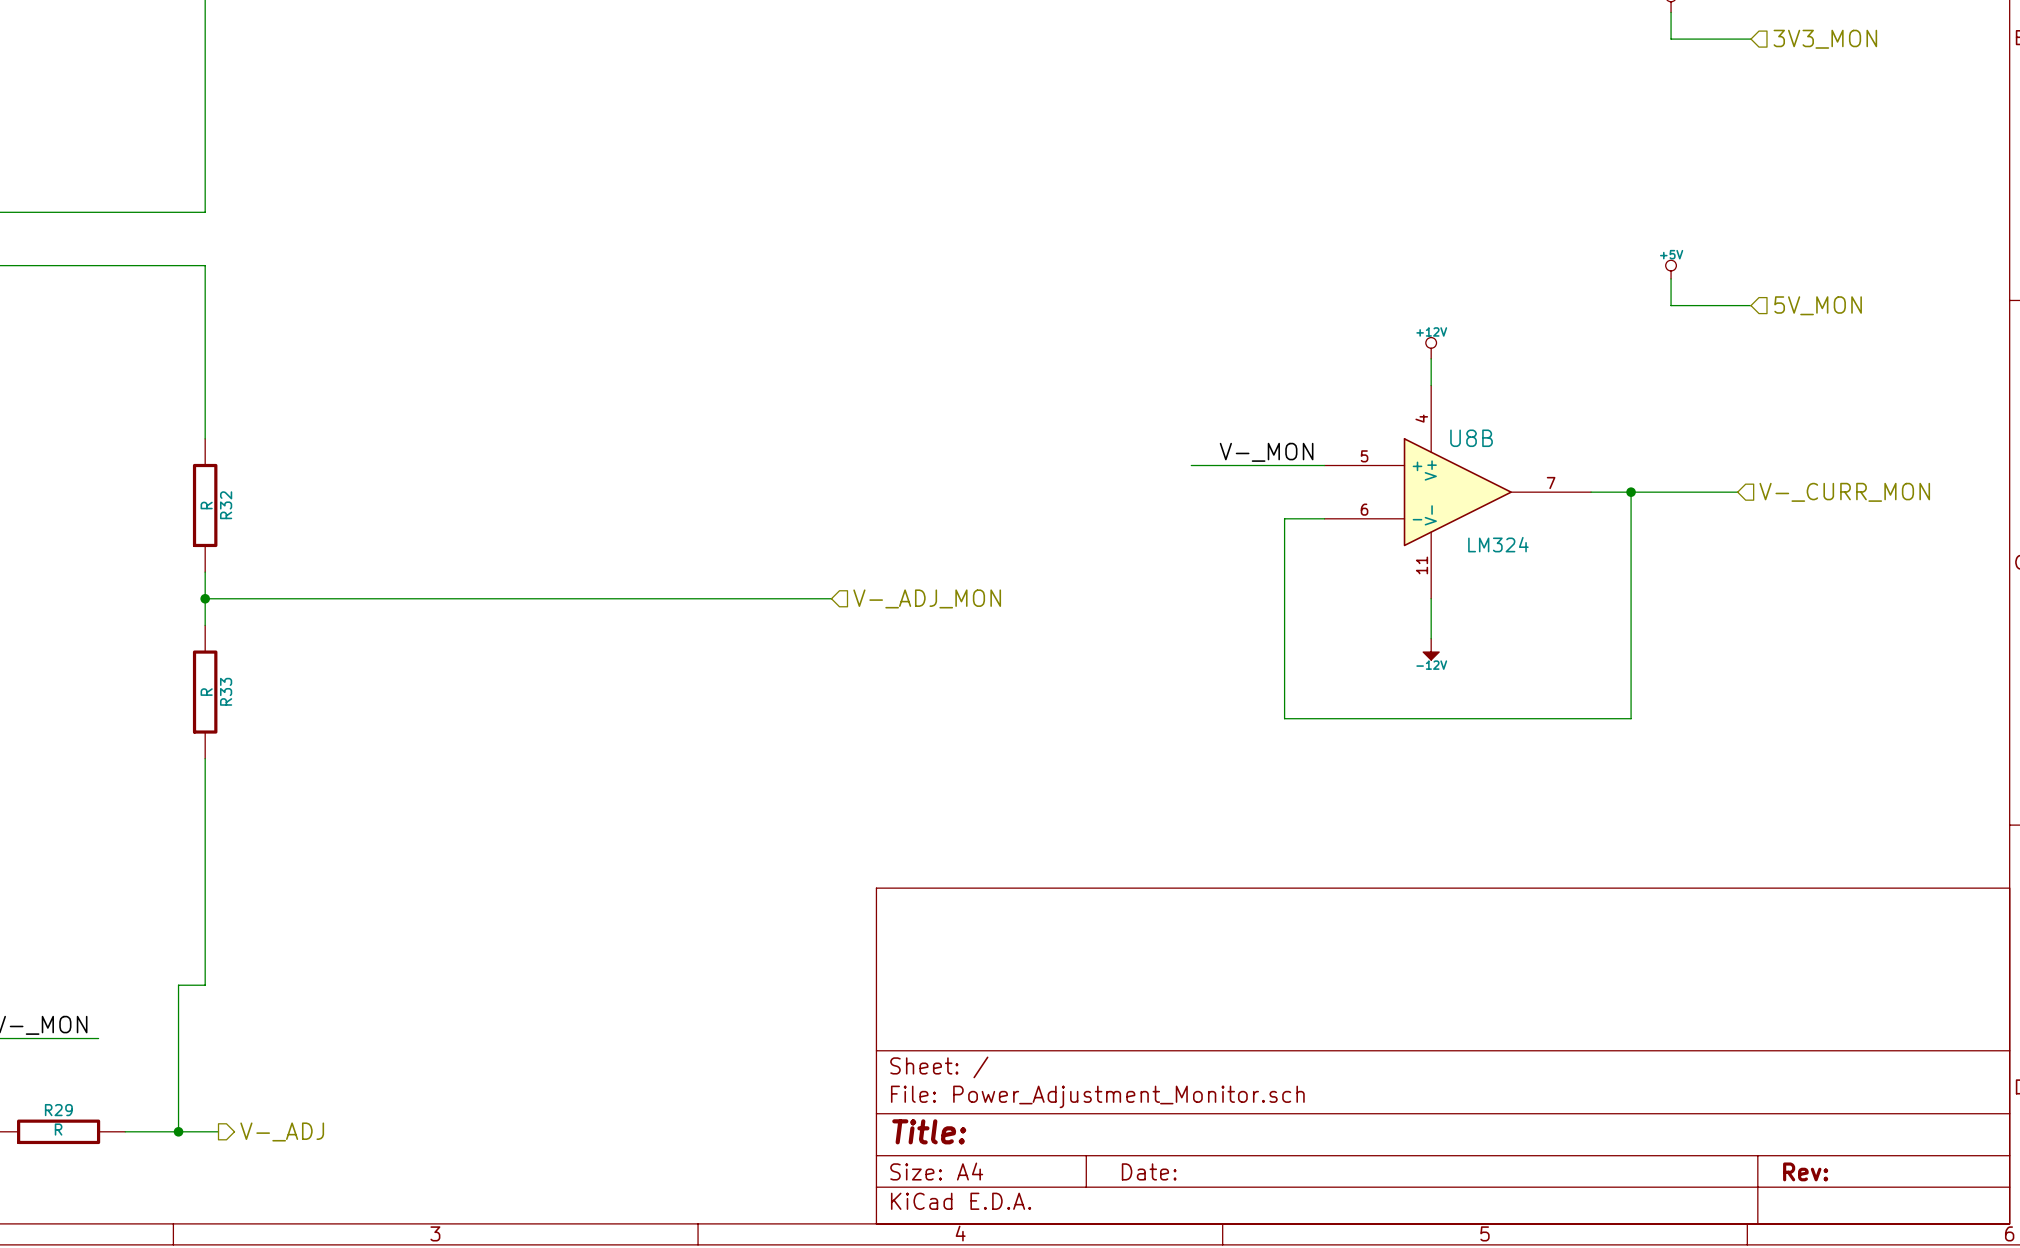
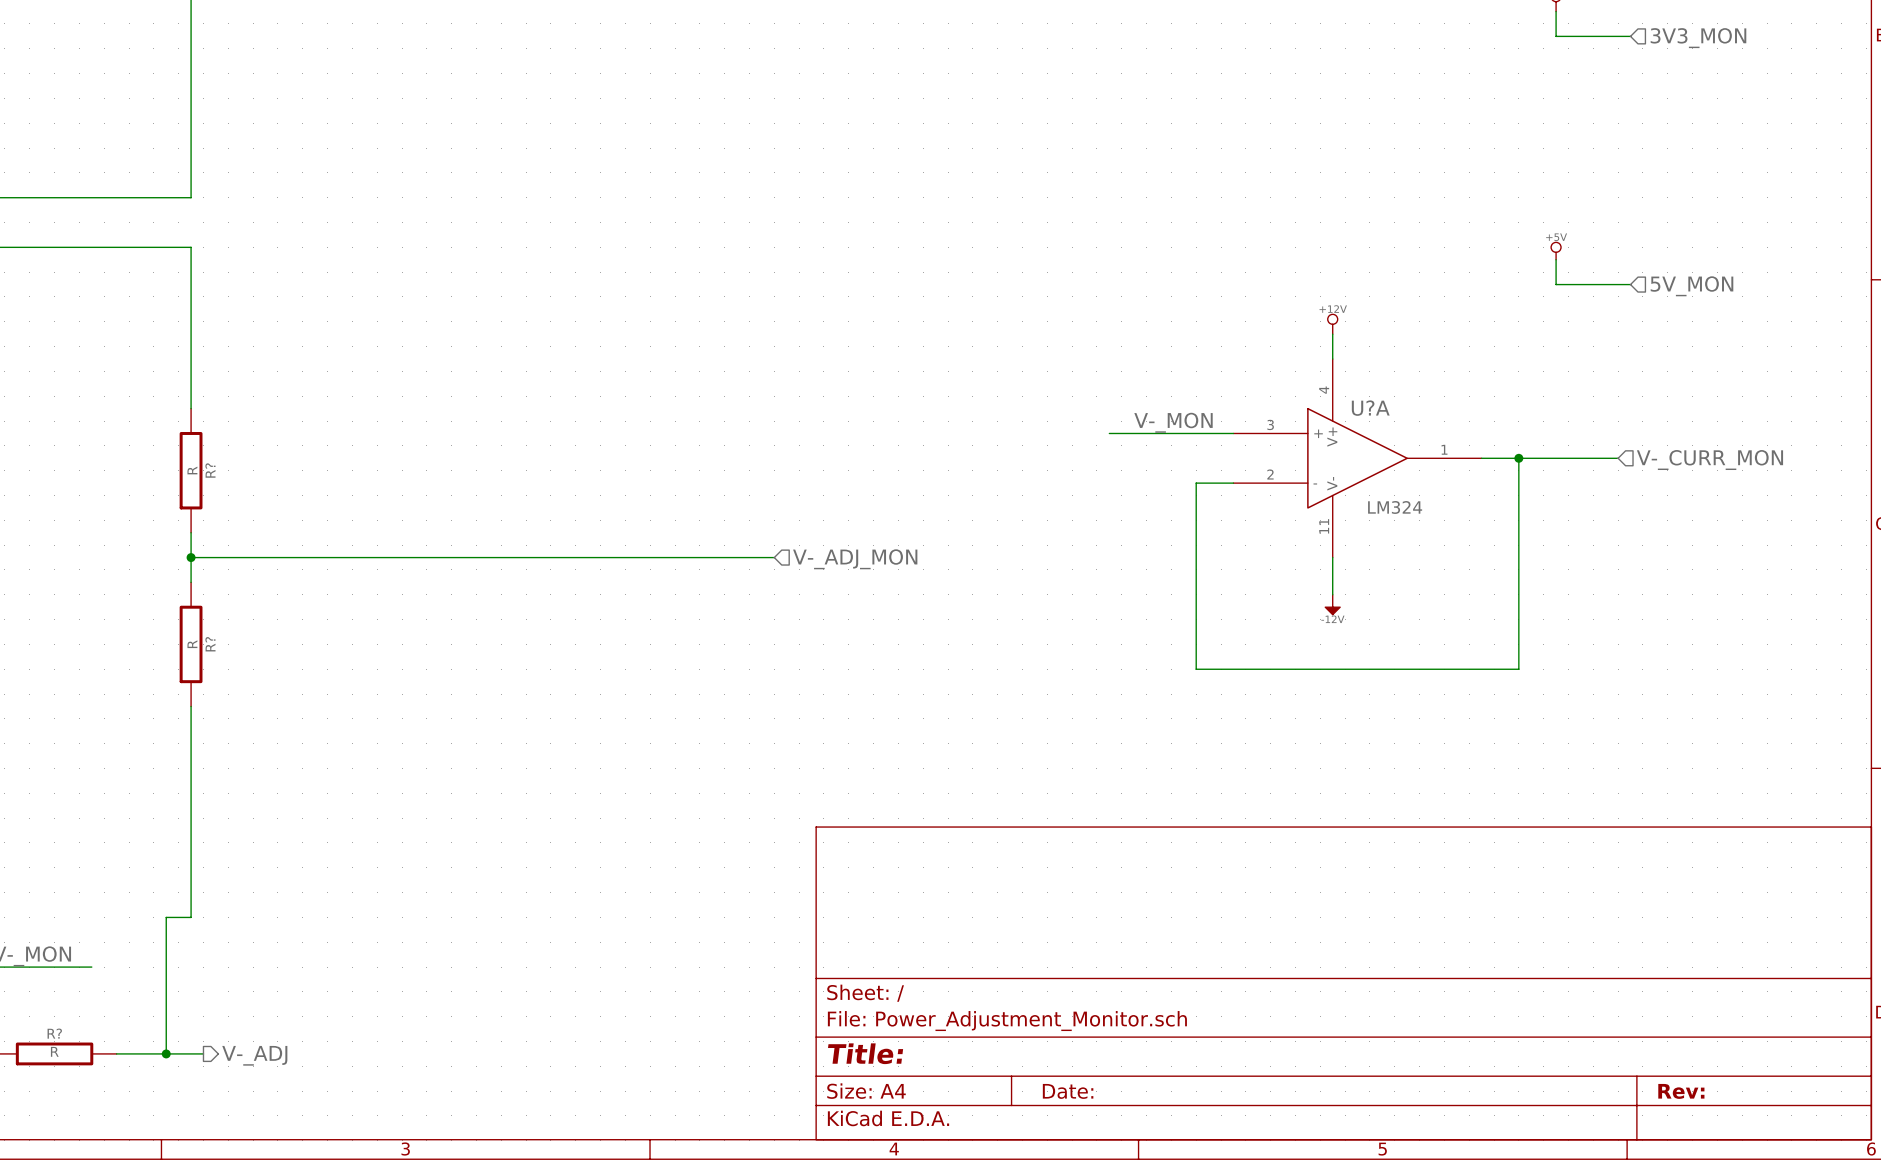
U8B name: U8B (1471, 438) -> U?A (1370, 408)
U8B pin number: 5 (1364, 456) -> 3 (1270, 424)
U8B pin number: 7 (1551, 482) -> 1 (1444, 449)
R32 name: R32 (226, 505) -> R? (210, 470)
U8B pin number: 6 (1364, 509) -> 2 (1270, 474)
R33 name: R33 (226, 691) -> R? (210, 644)
R29 name: R29 (58, 1110) -> R? (54, 1033)

